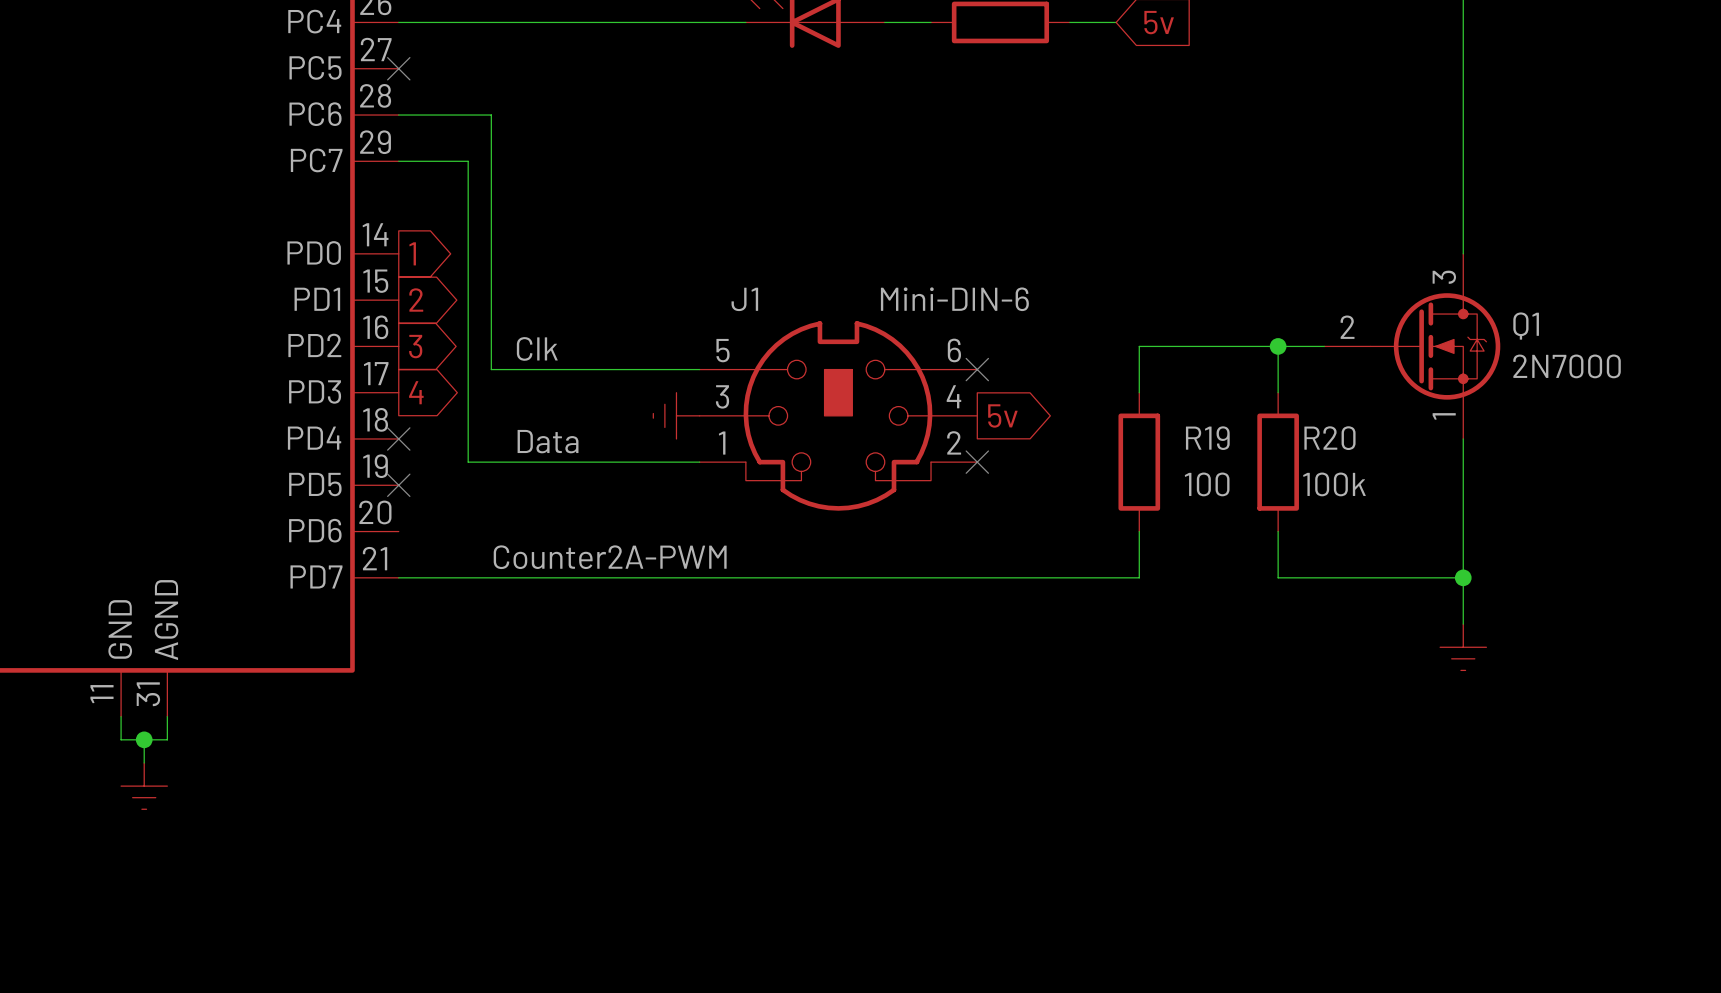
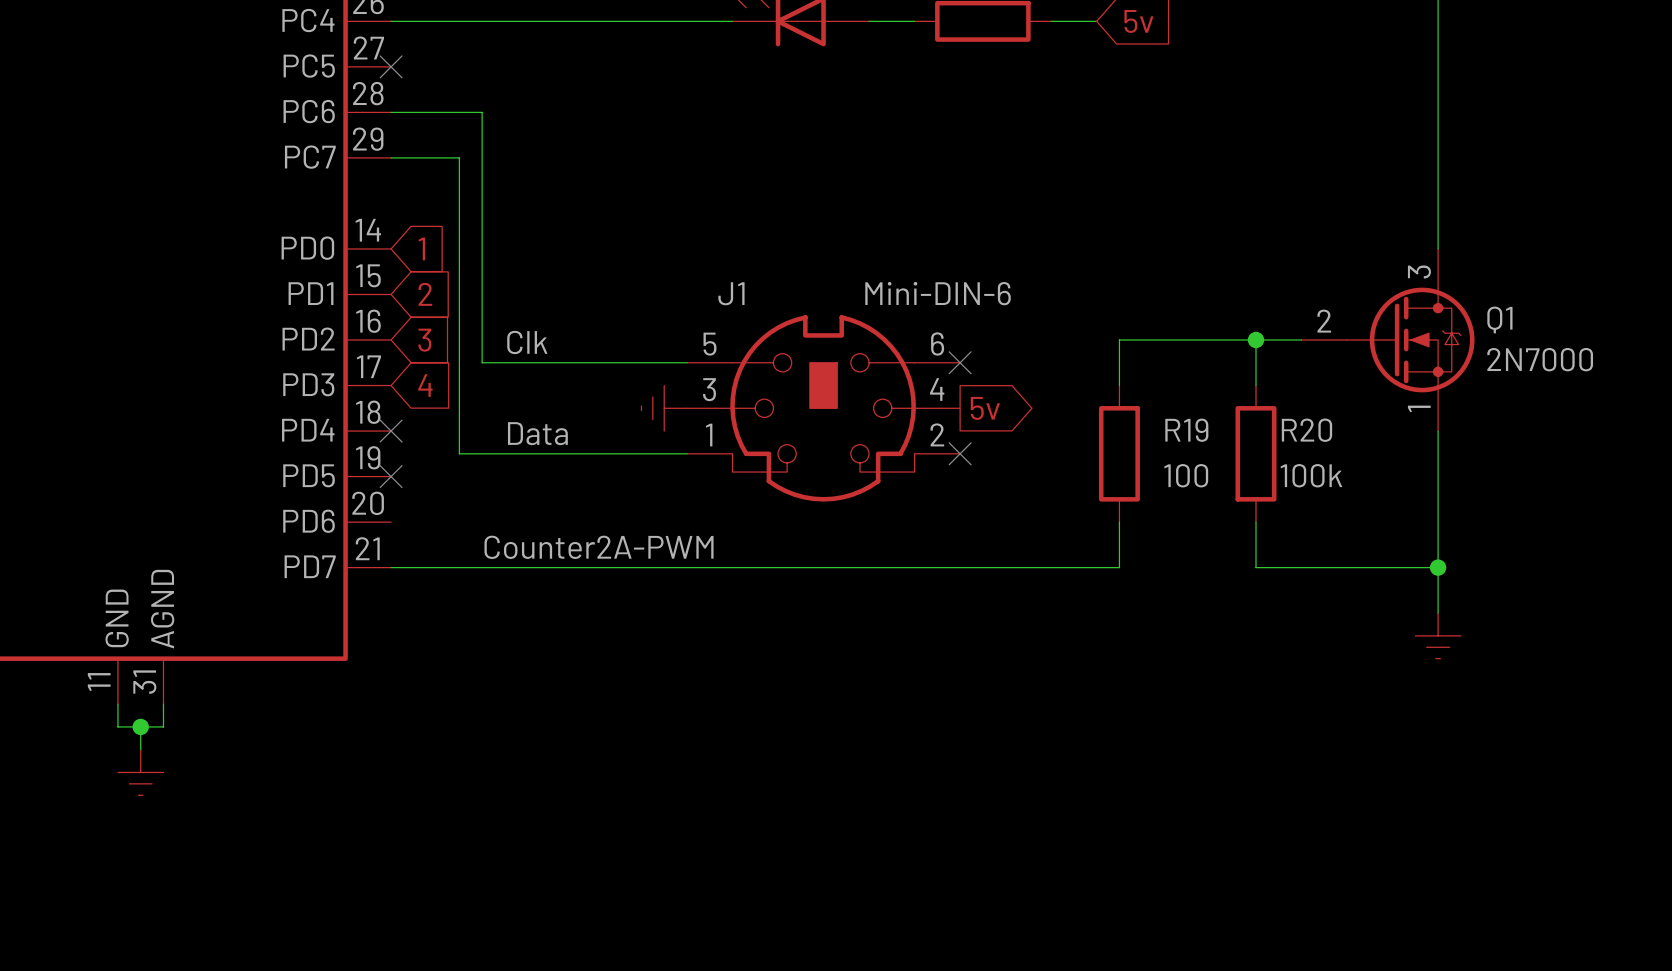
global label shape: output (412, 253) -> input (421, 248)
global label shape: output (416, 300) -> input (425, 294)
global label shape: output (415, 346) -> input (424, 340)
global label shape: output (416, 392) -> input (425, 385)

